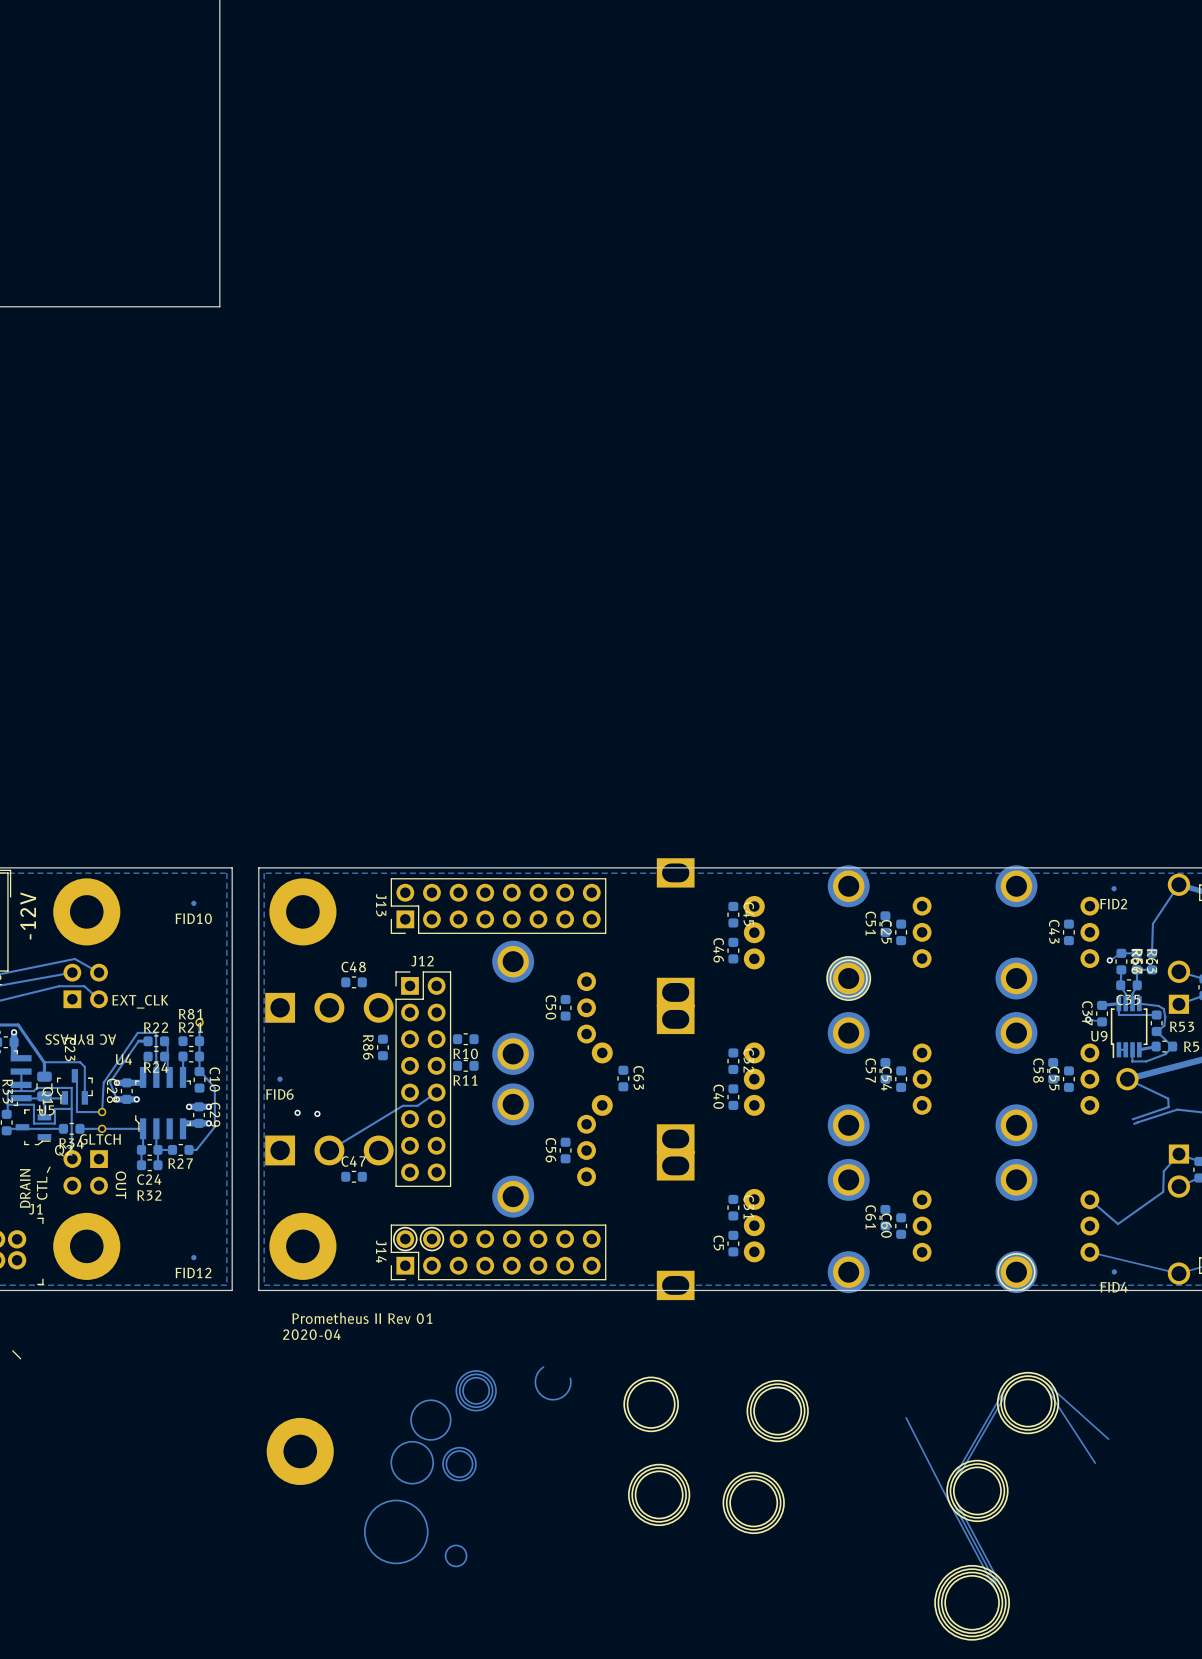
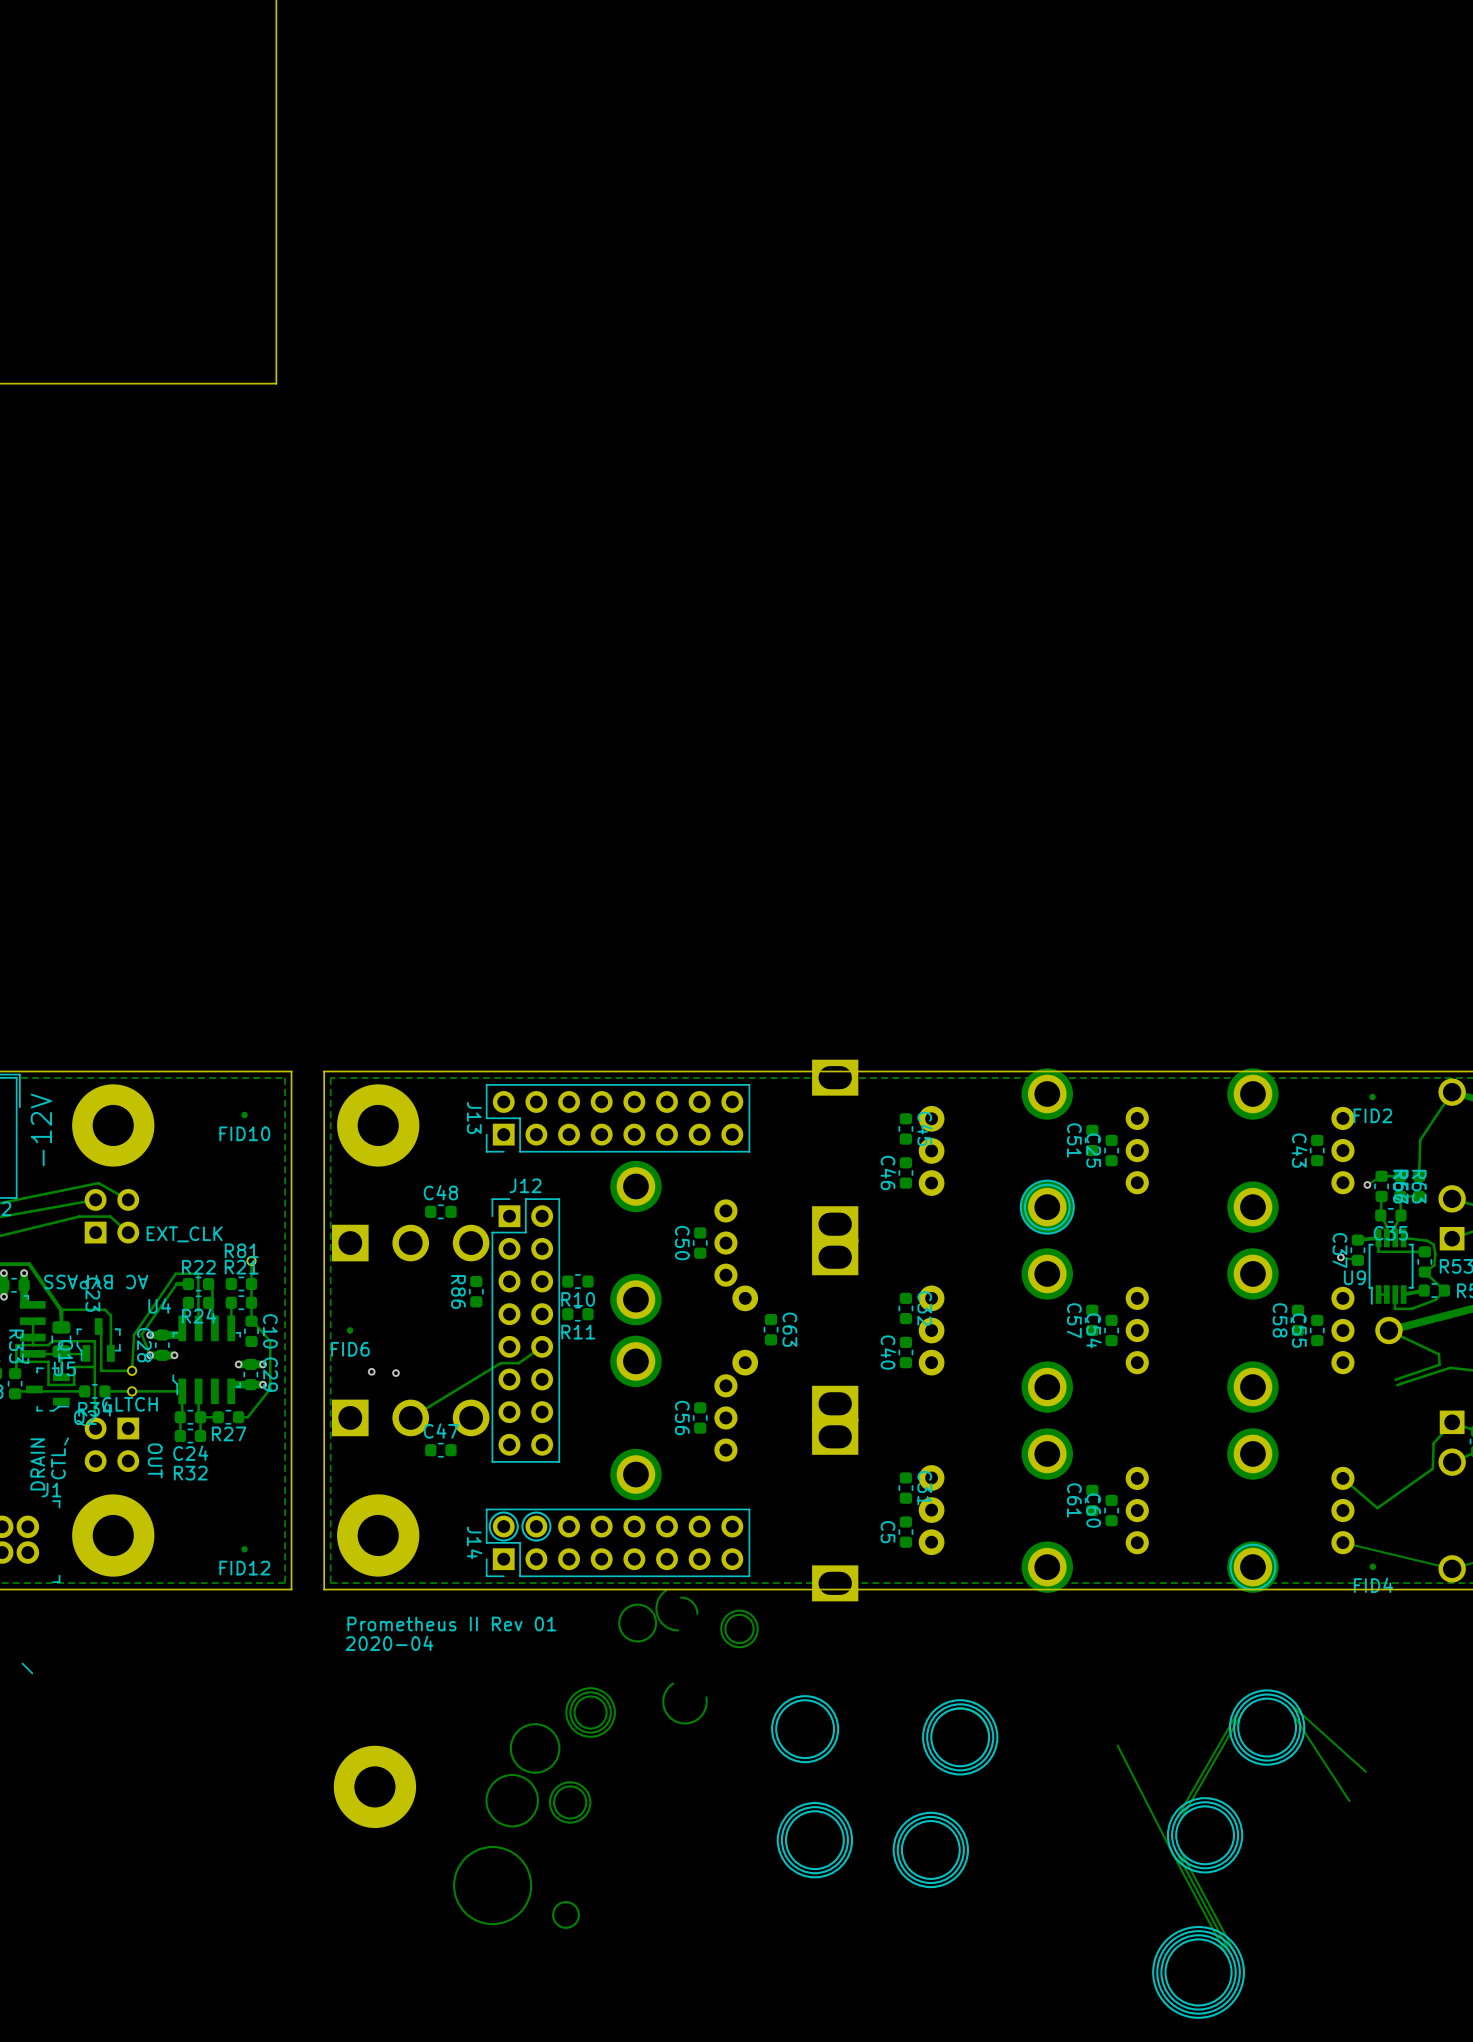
track: none -> (666, 1590) (657, 1601) (657, 1614) (665, 1626) (678, 1630)
track: none -> (681, 1597) (692, 1602) (697, 1613)
drawing: none -> [618, 1603, 658, 1643]
drawing: none -> [720, 1609, 759, 1649]

